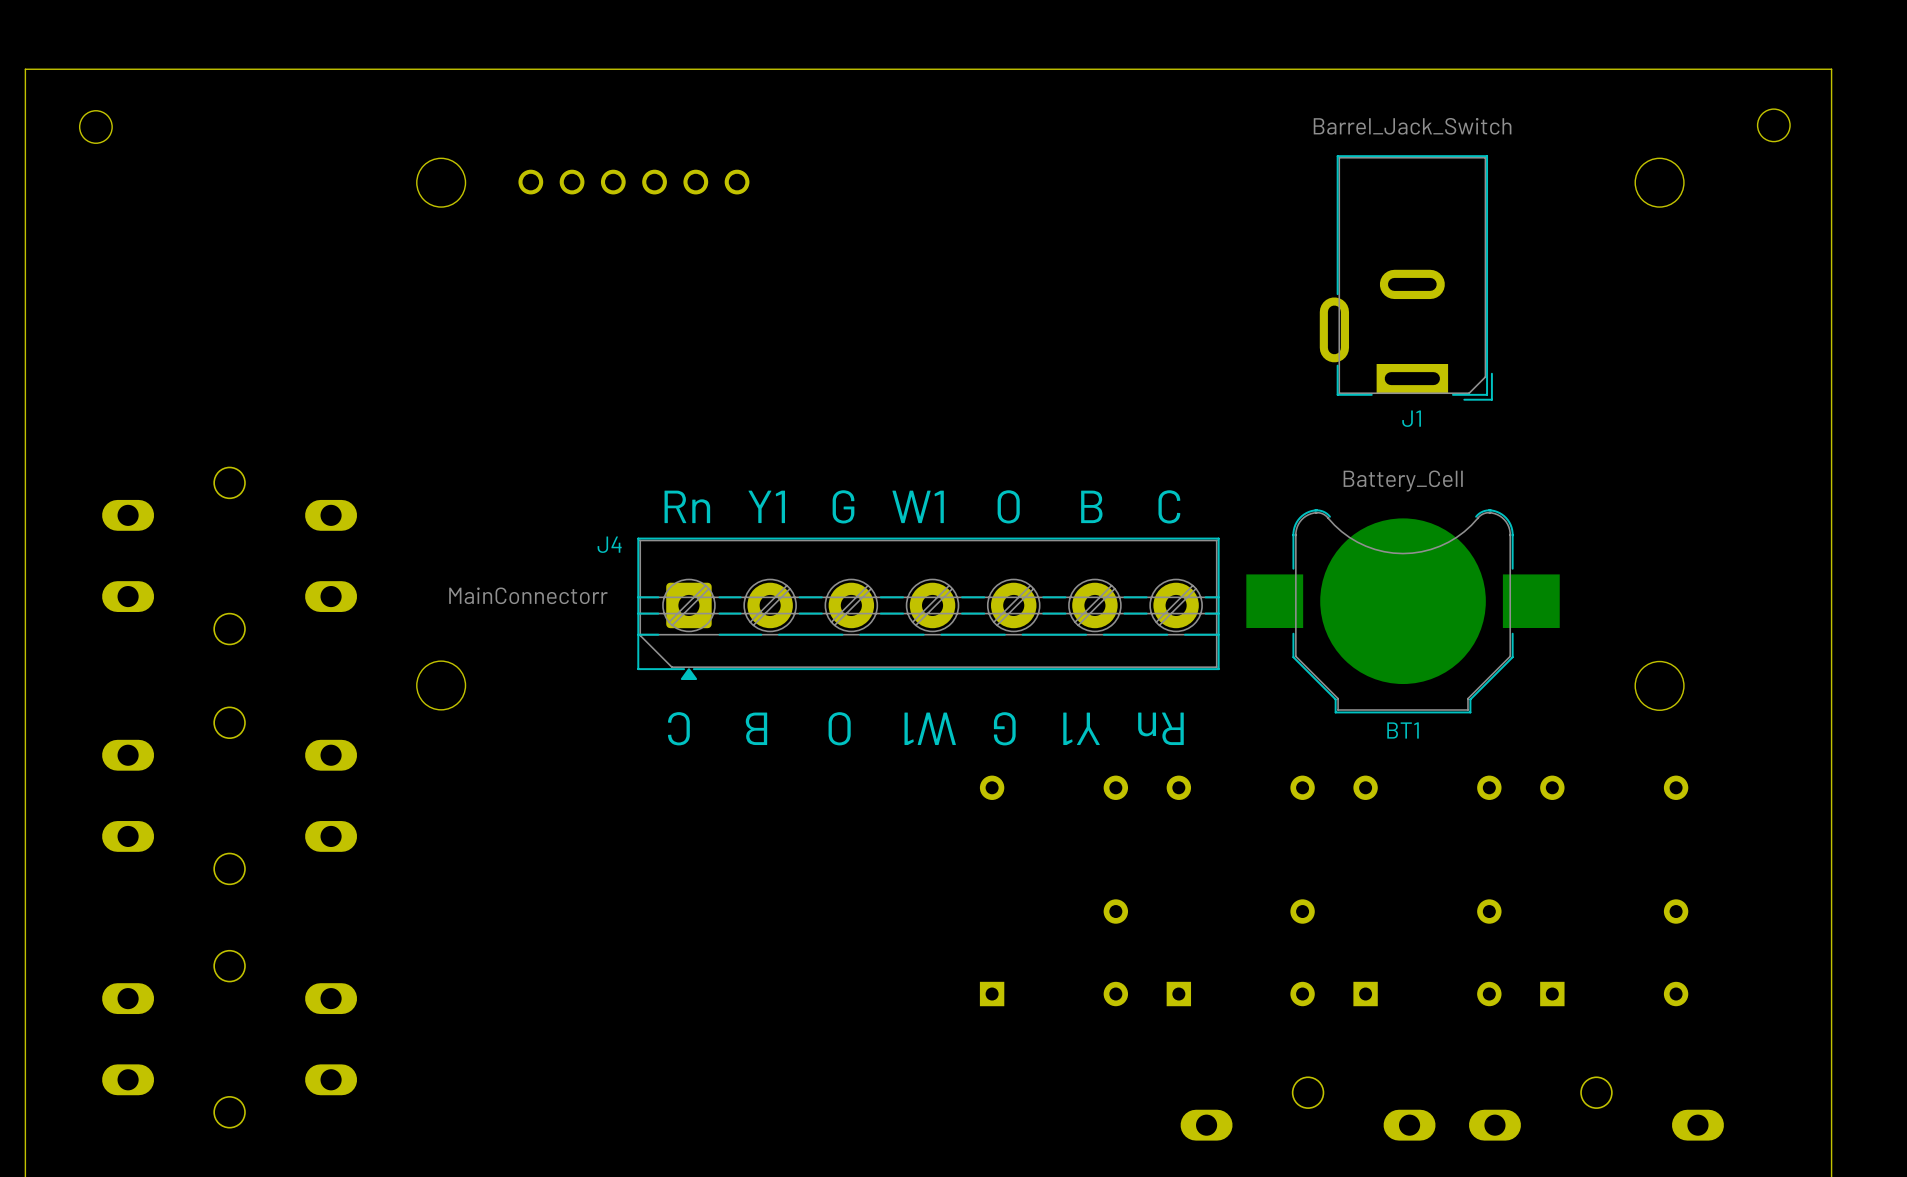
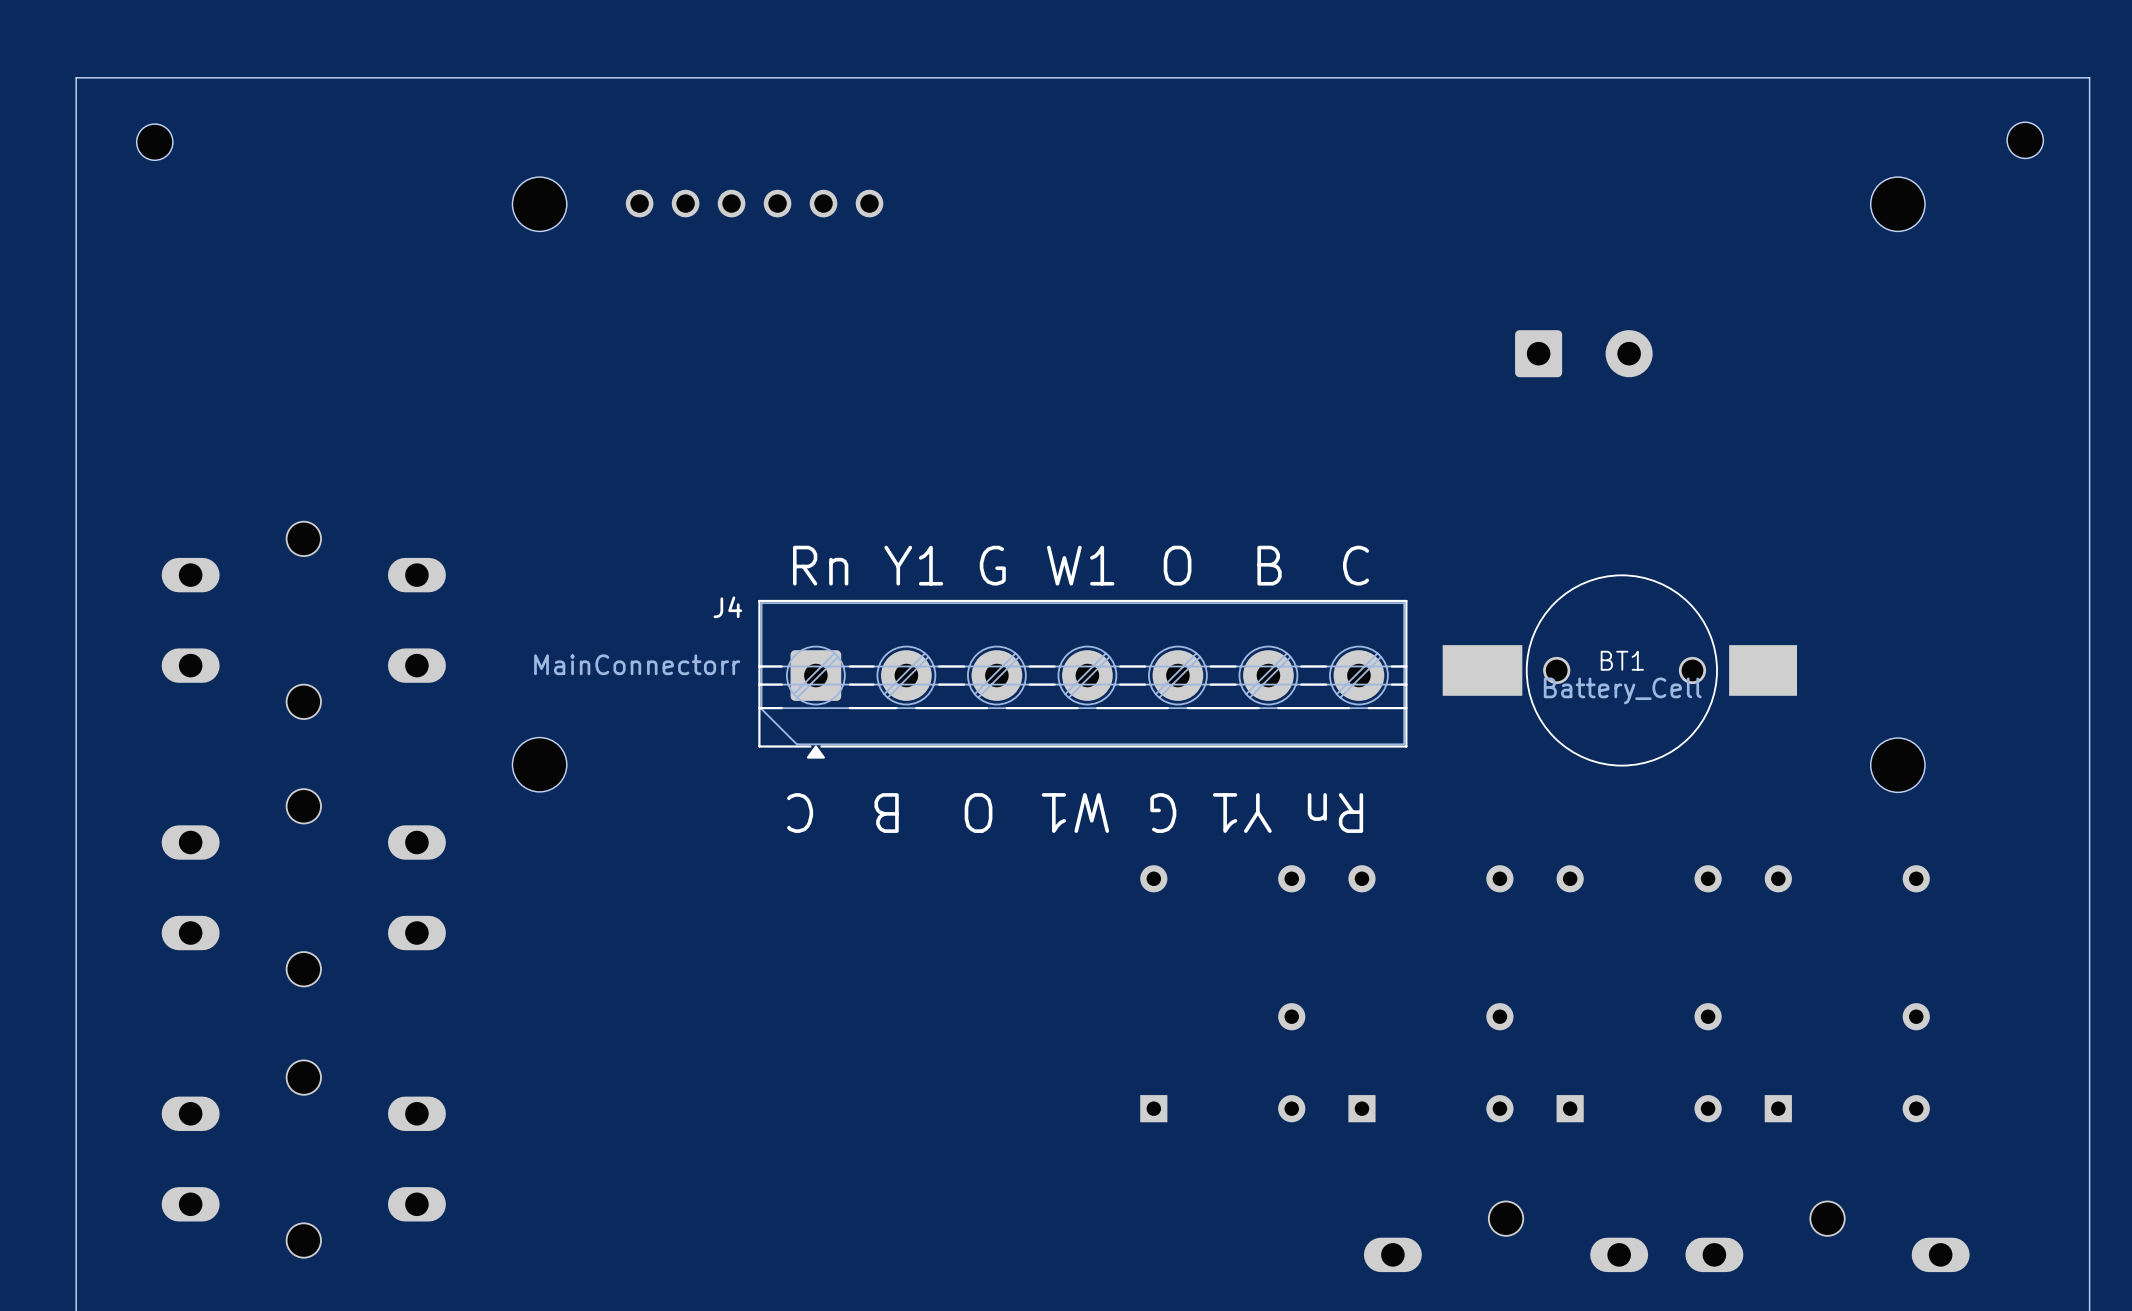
J1: Barrel_Jack_Switch (1406, 277) -> none
part: none -> (1583, 353)
BT1 value position: Battery_Cell (1403, 481) -> Battery_Cell (1622, 690)
BT1 footprint: [1246, 509, 1560, 714] -> [1442, 574, 1798, 767]
BT1 name position: BT1 (1403, 730) -> BT1 (1622, 660)

